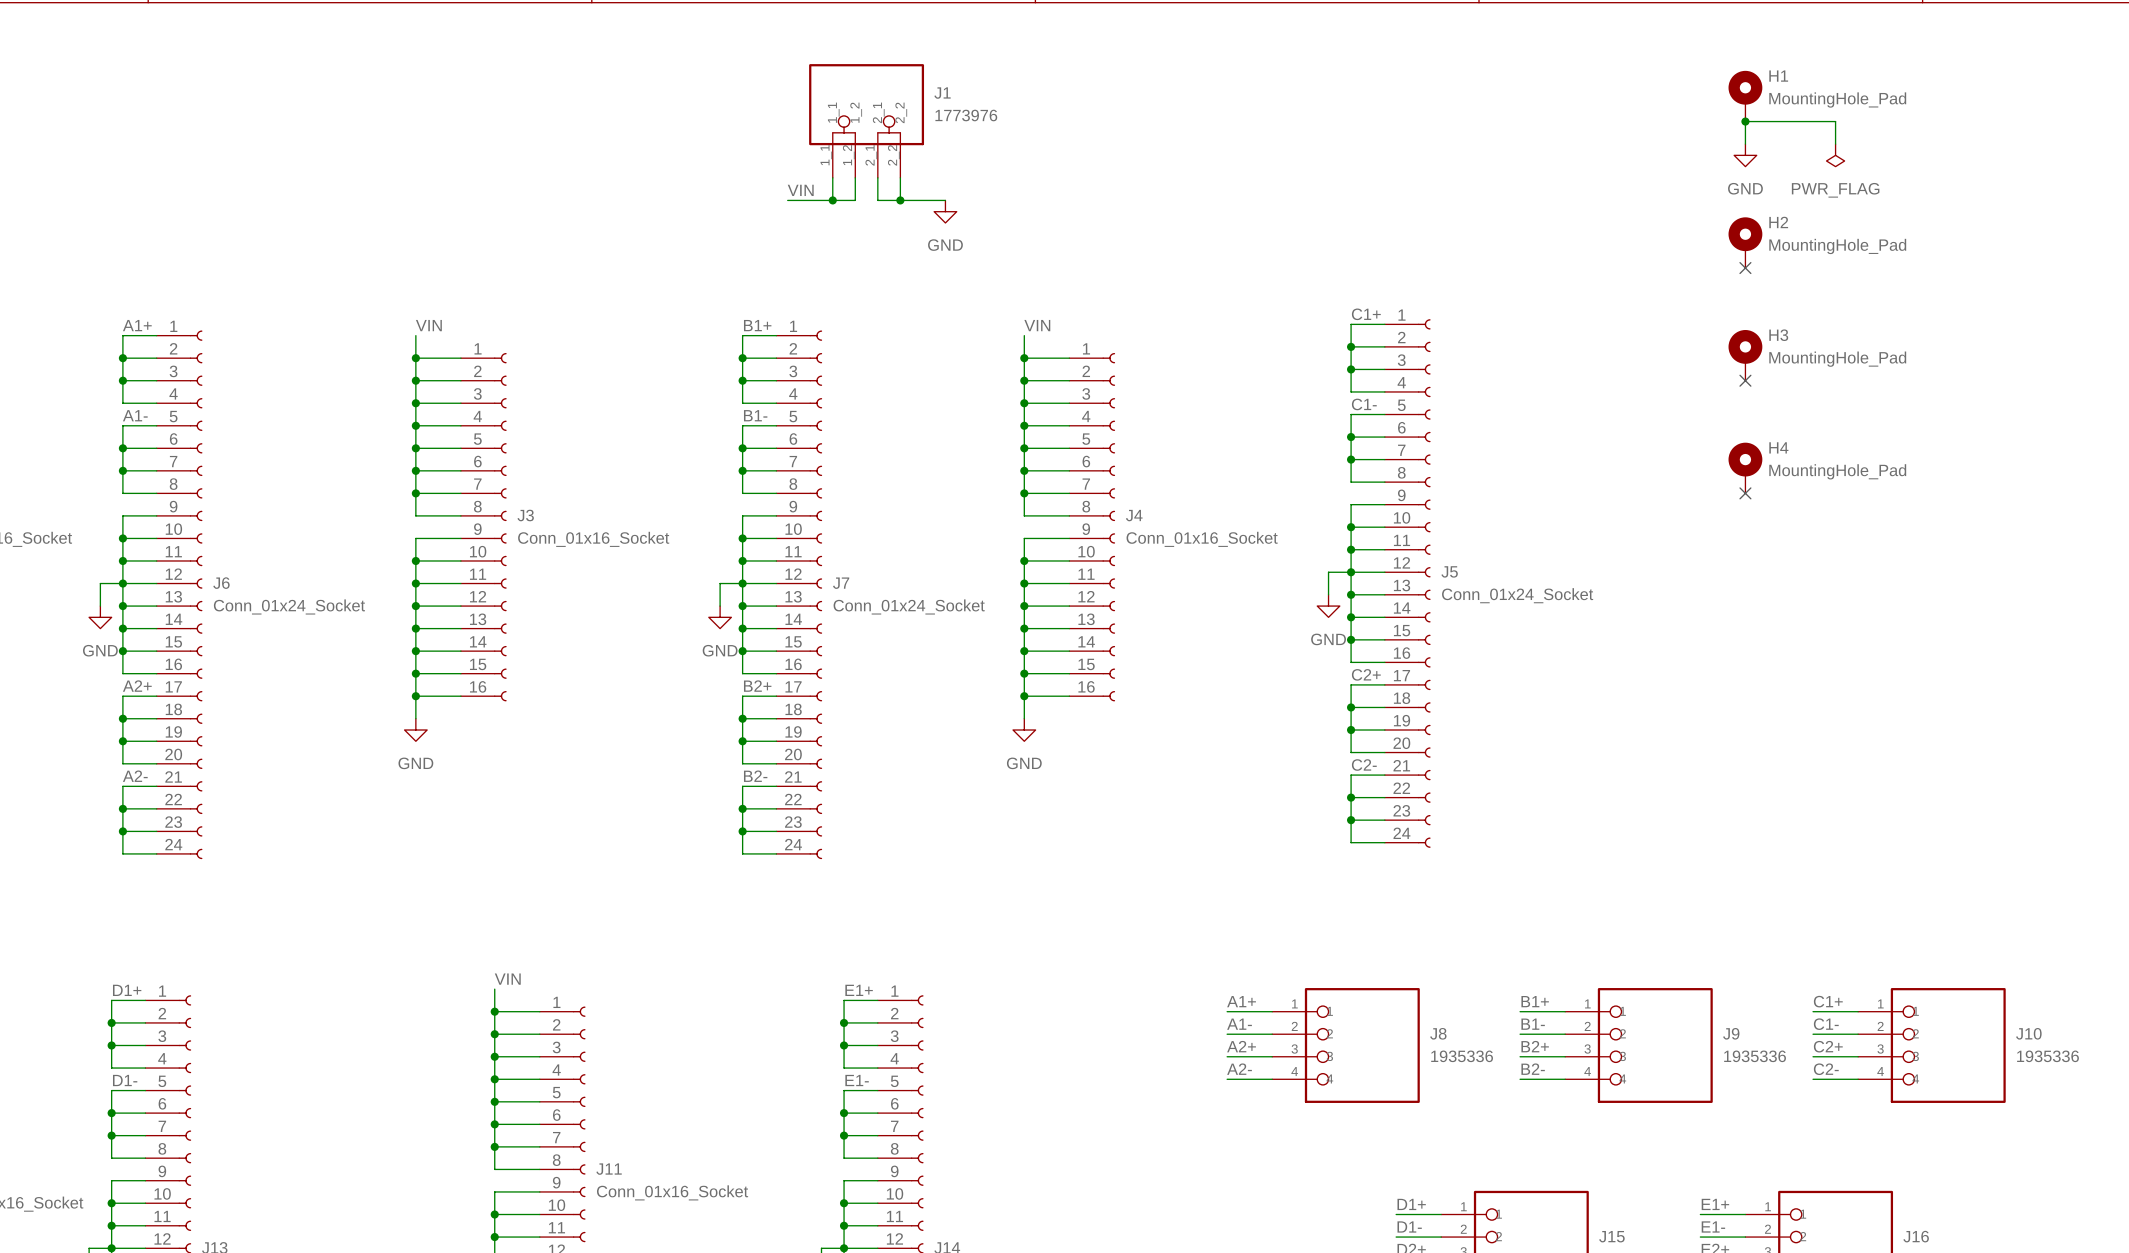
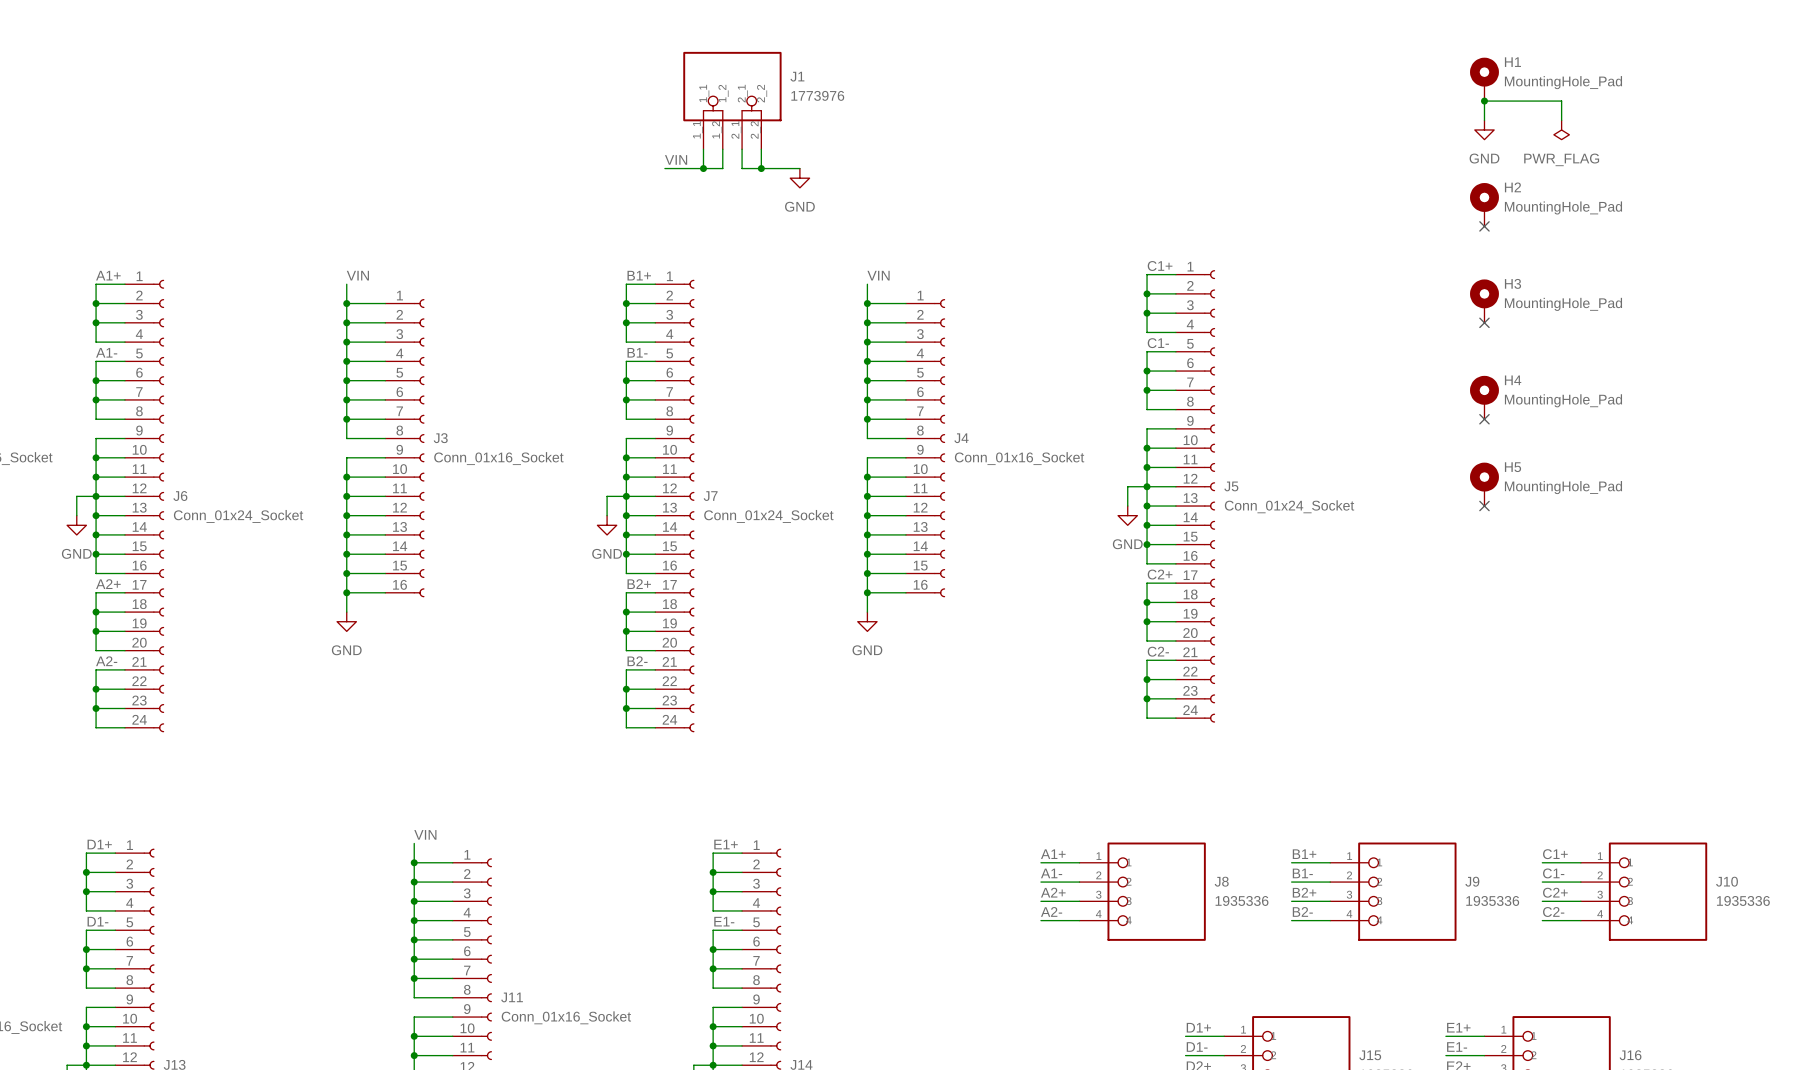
H5: none -> MountingHole_Pad (1484, 484)
no-connect mark: none -> (1484, 506)

